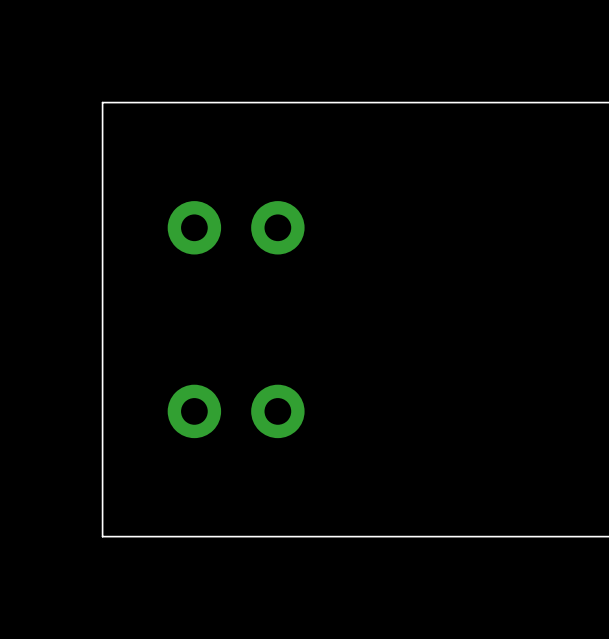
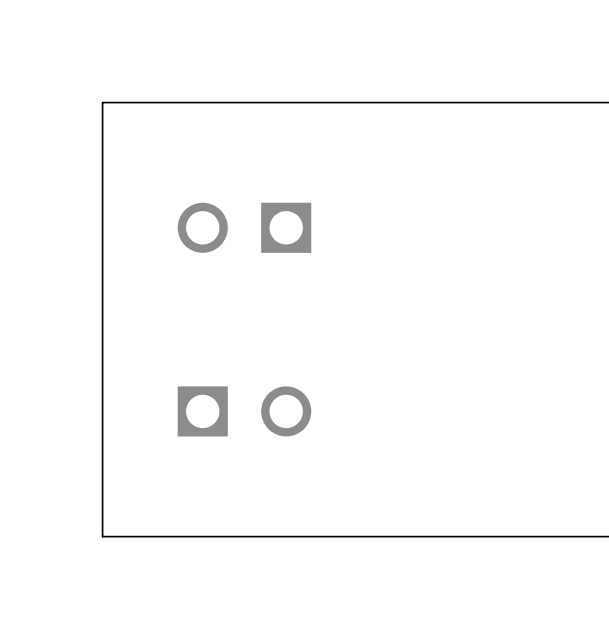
part footprint: [167, 201, 305, 255] -> [177, 202, 312, 253]
part footprint: [167, 384, 305, 439] -> [177, 386, 312, 437]

